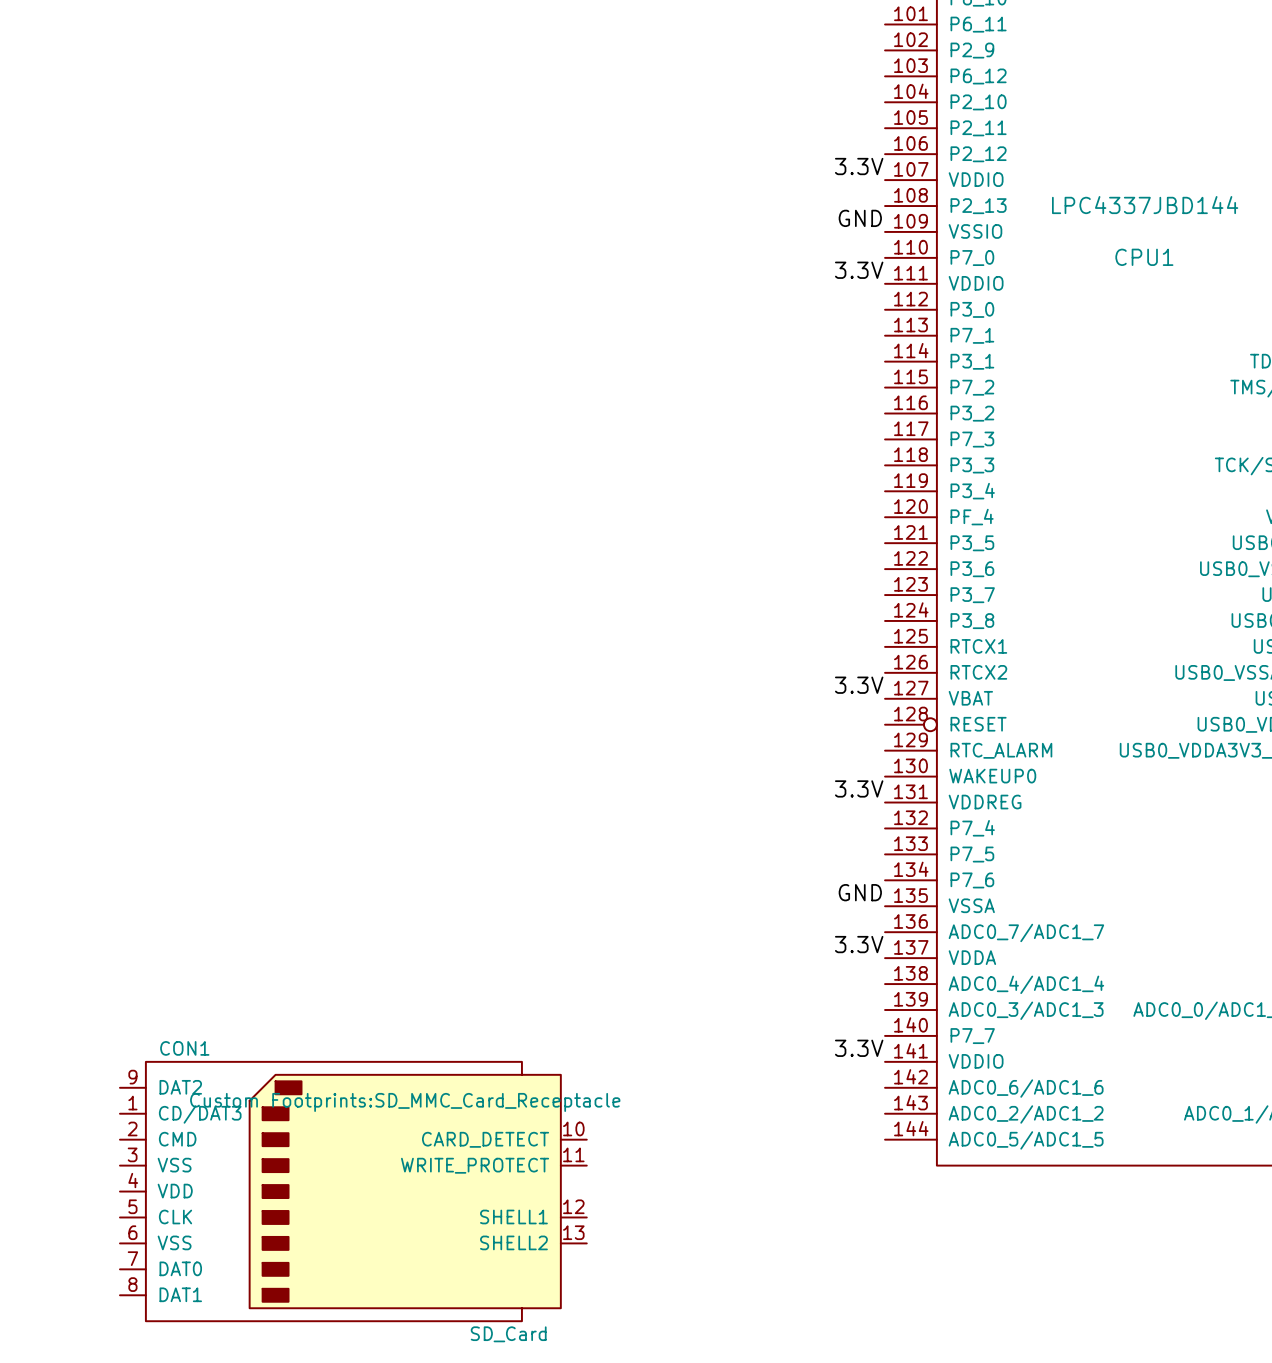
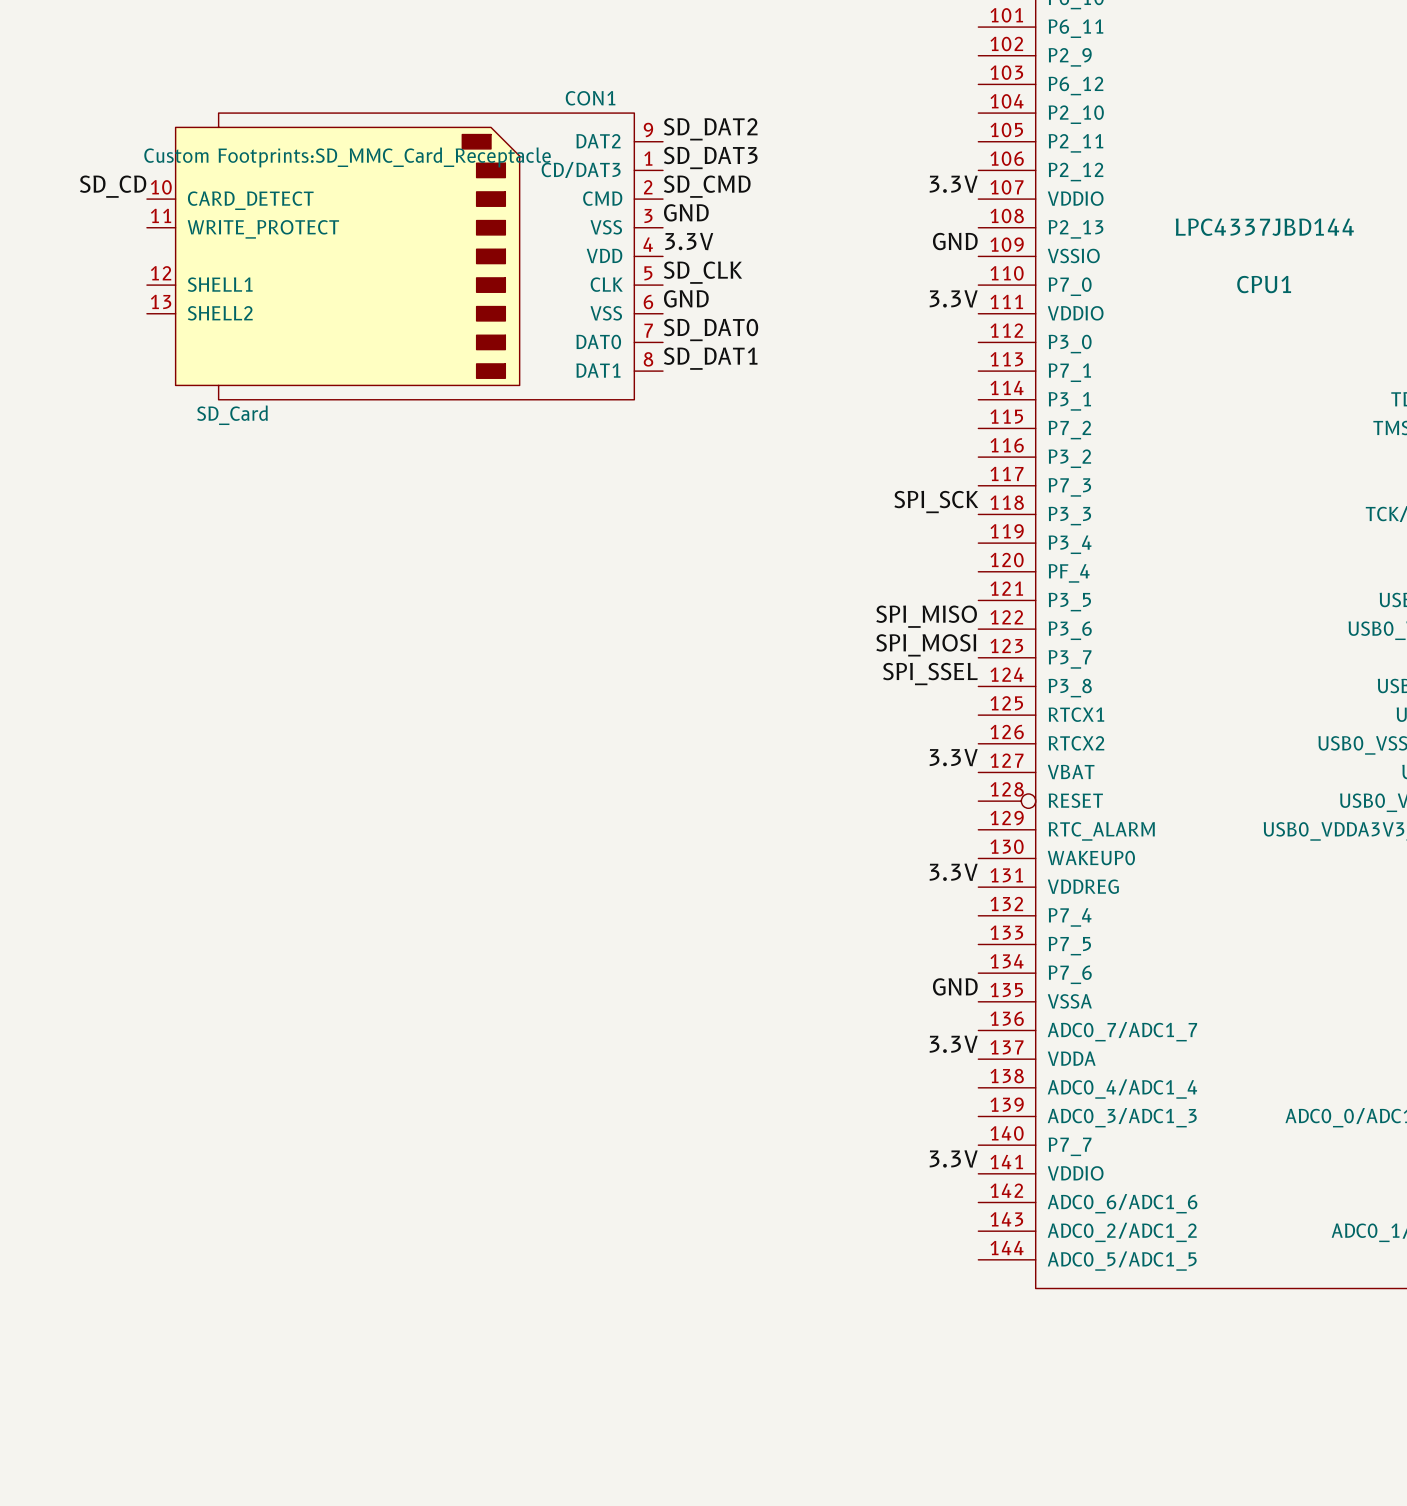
label: none -> SD_DAT2 (710, 129)
label: none -> SD_DAT3 (710, 157)
label: none -> SD_CD (113, 186)
label: none -> SD_CMD (707, 186)
label: none -> GND (686, 212)
label: none -> 3.3V (689, 241)
label: none -> SD_CLK (703, 272)
label: none -> GND (686, 298)
label: none -> SD_DAT0 (711, 329)
label: none -> SD_DAT1 (710, 358)
label: none -> SPI_SCK (936, 502)
label: none -> SPI_MISO (926, 616)
label: none -> SPI_MOSI (926, 645)
label: none -> SPI_SSEL (930, 674)
CON1 flip: as is (353, 1191) -> left-right (404, 256)
CON1 position: (353, 1191) -> (404, 256)

